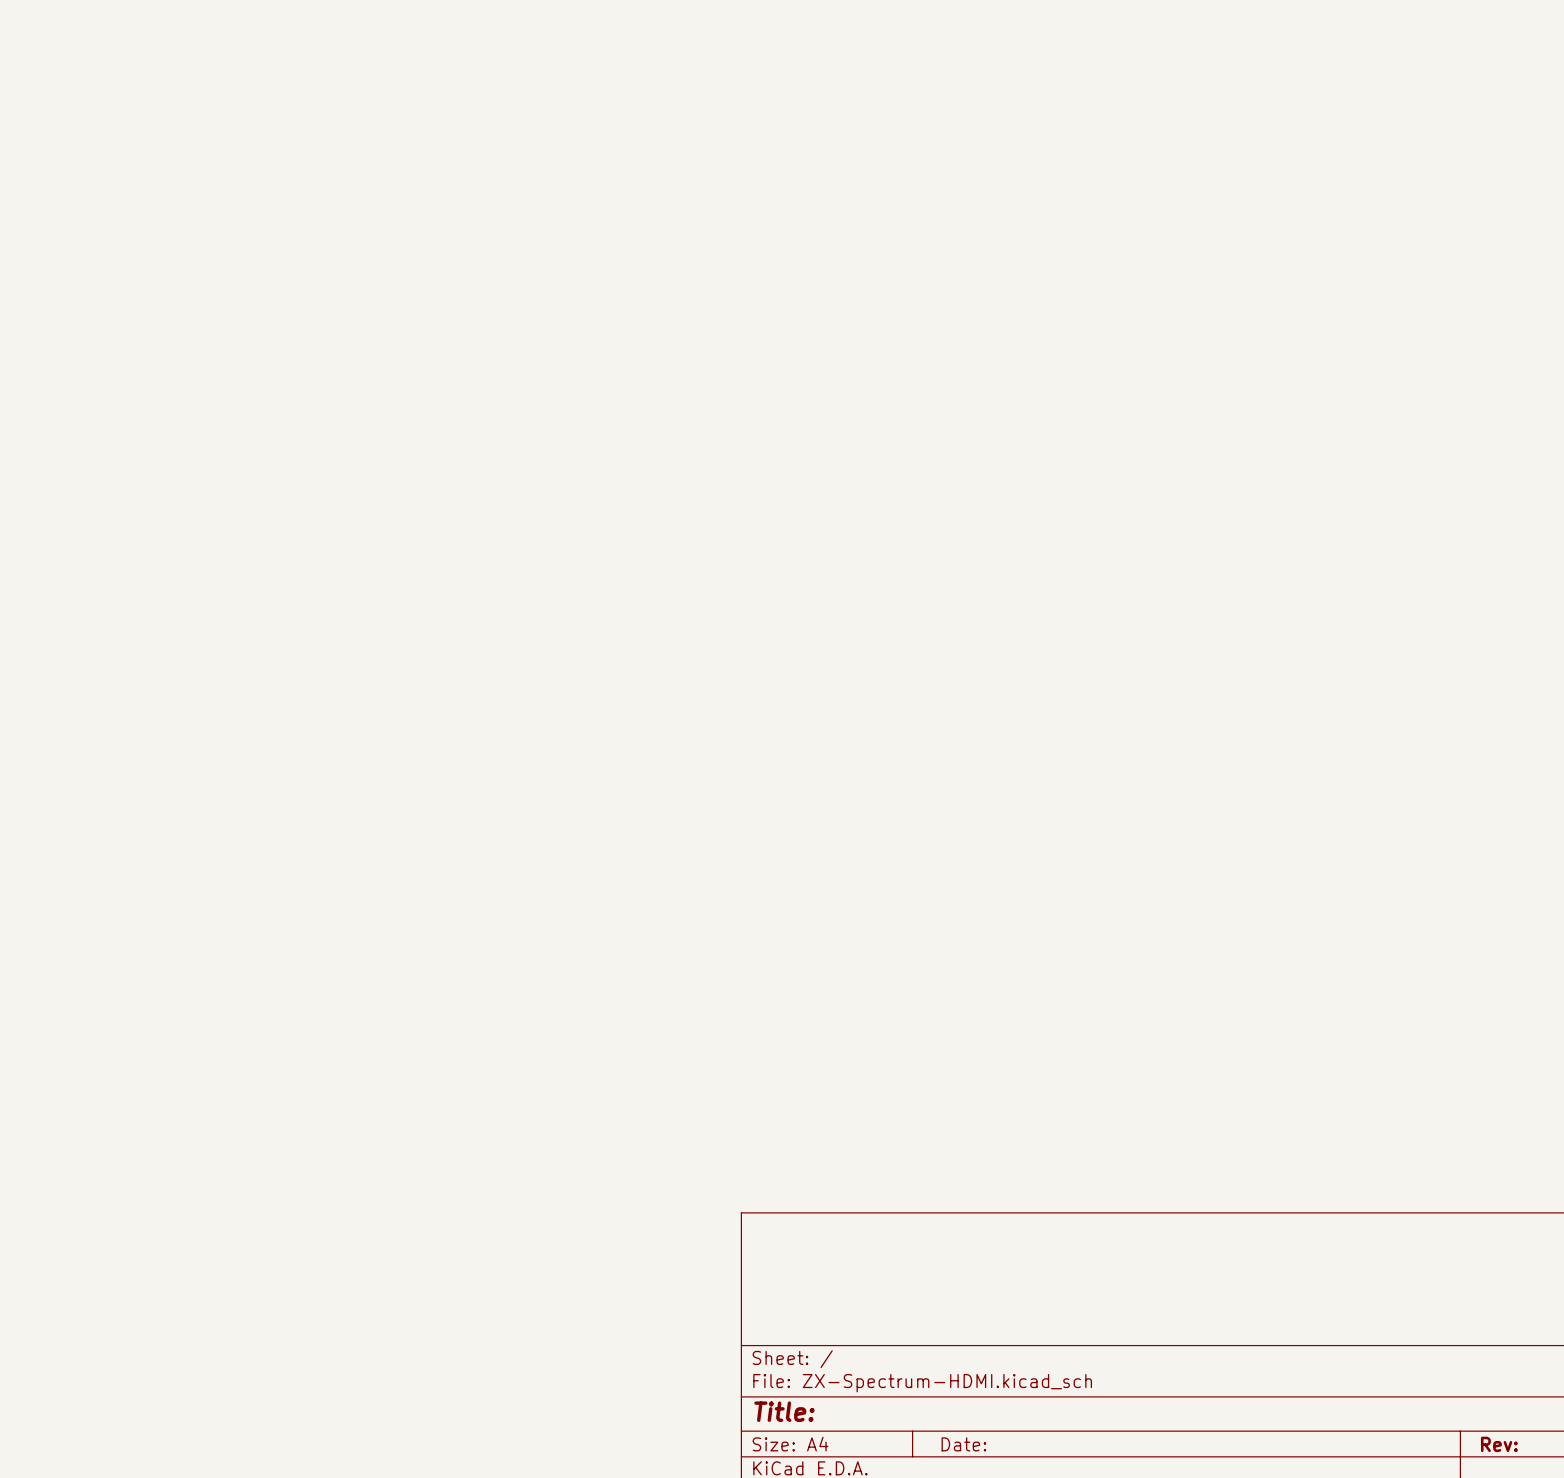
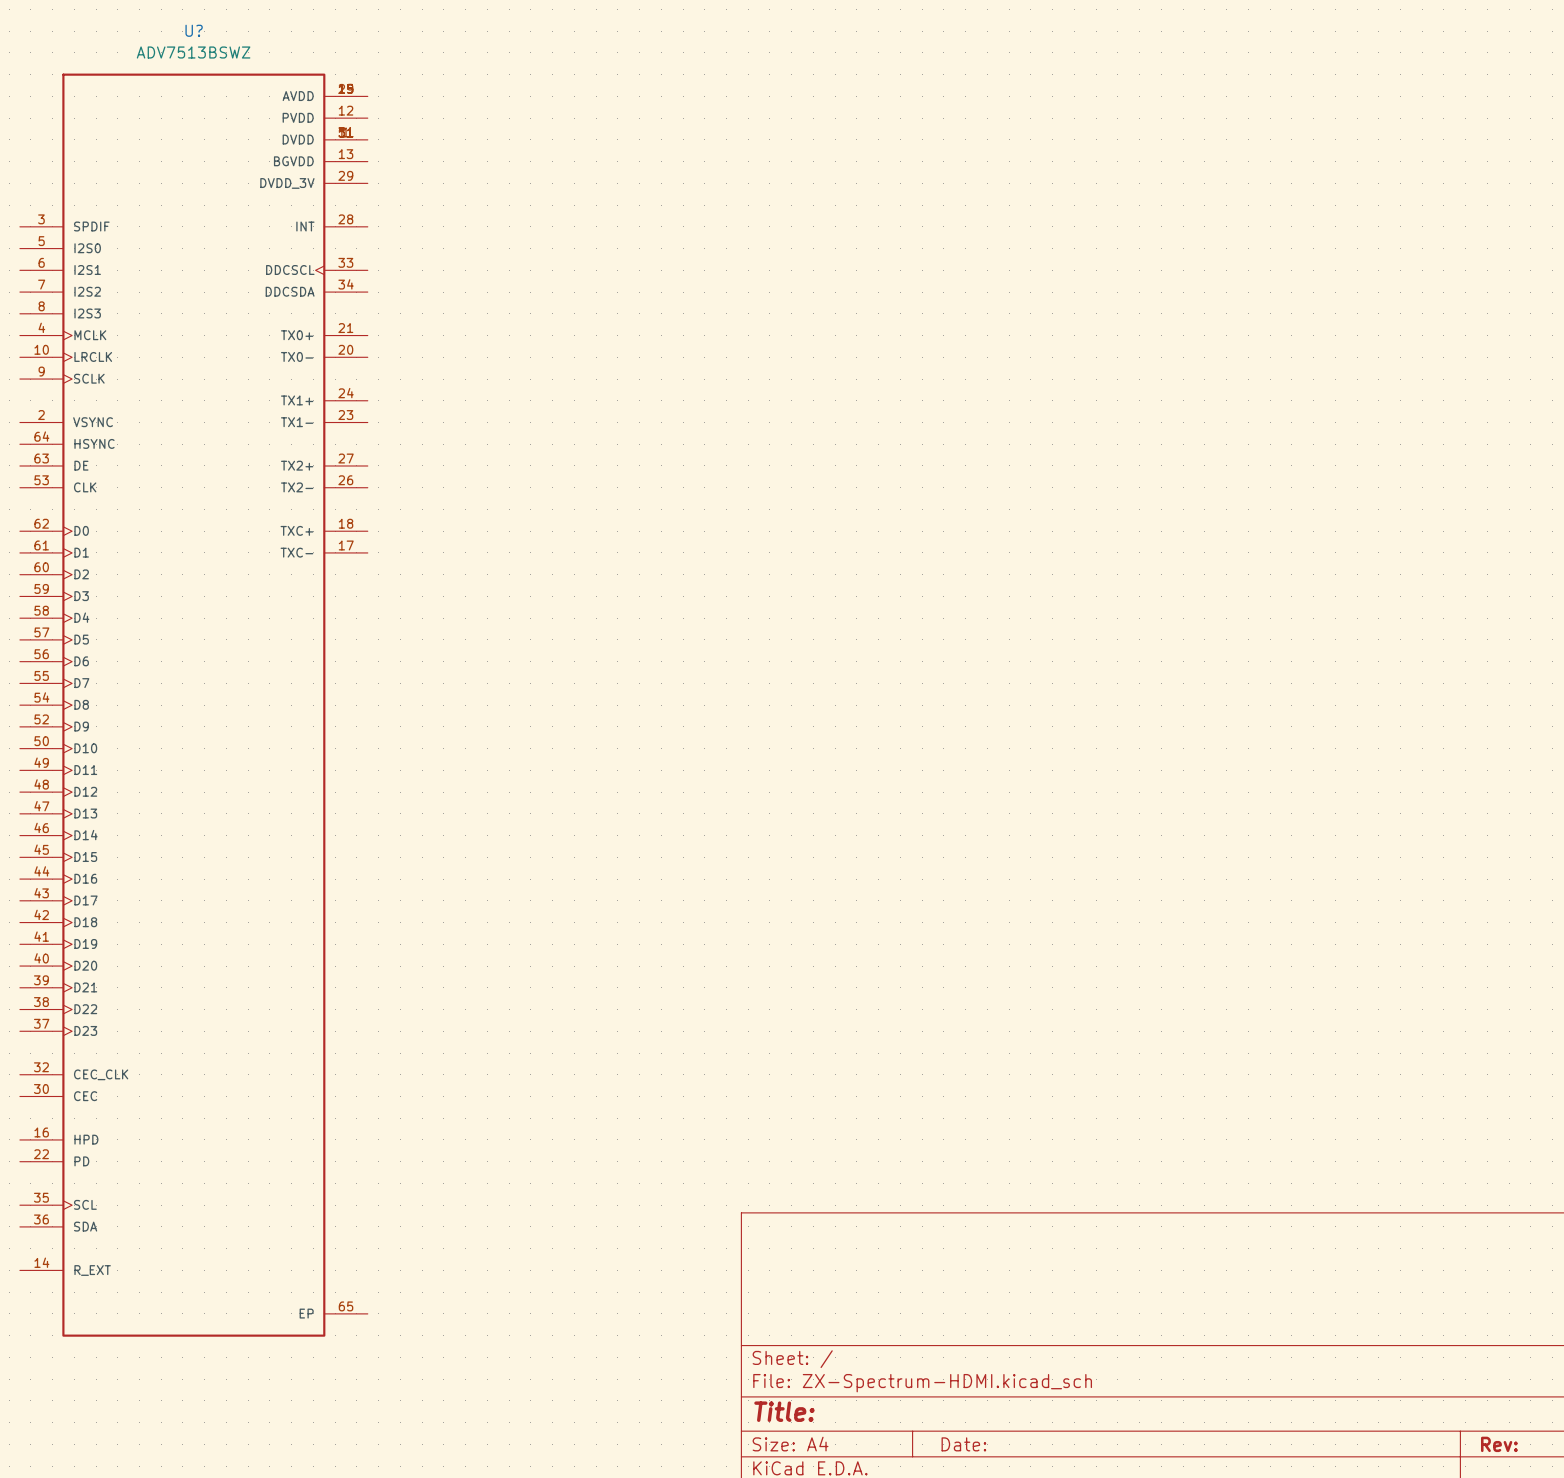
U?: none -> ADV7513BSWZ (193, 705)

